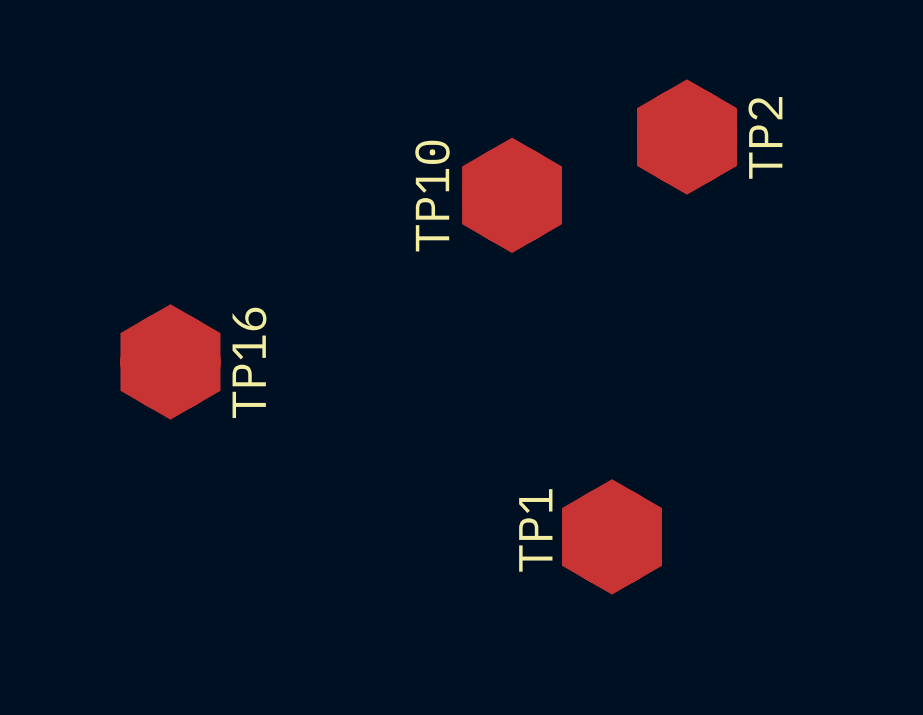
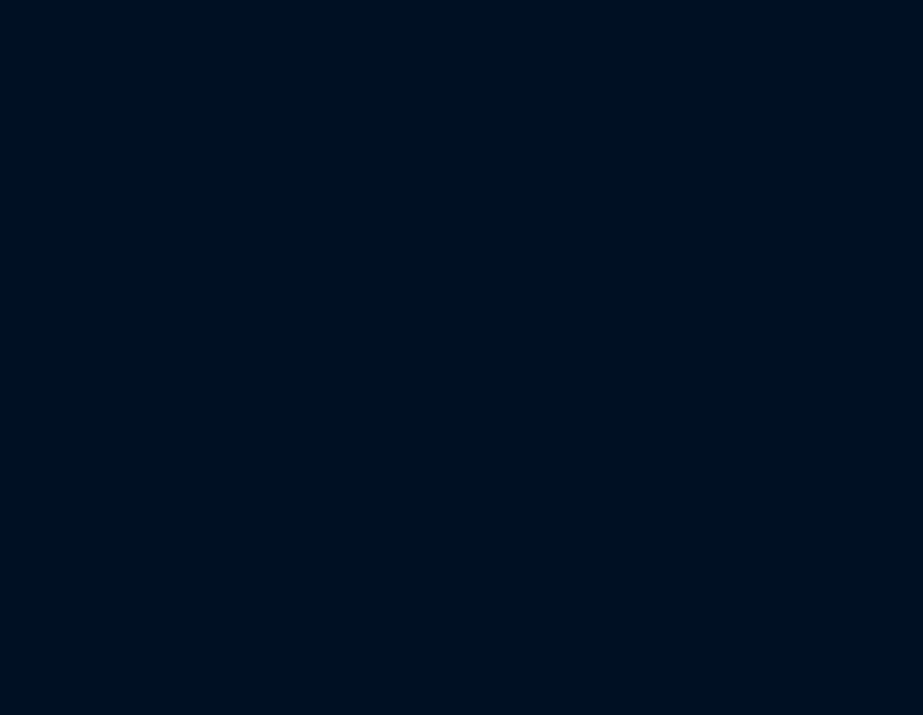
TP2: (686, 137) -> none
TP10: (512, 195) -> none
TP16: (170, 361) -> none
TP1: (612, 536) -> none

